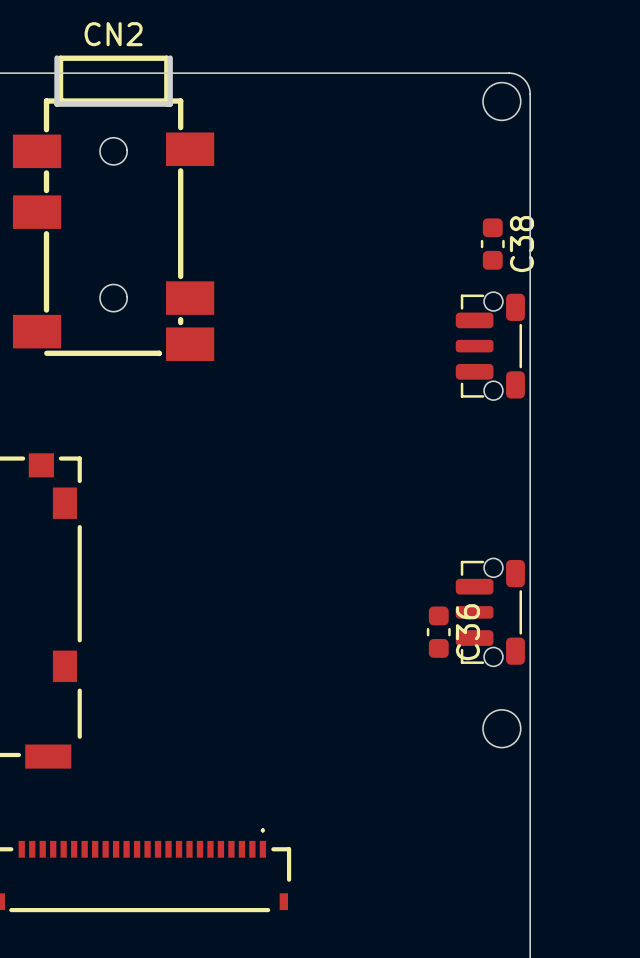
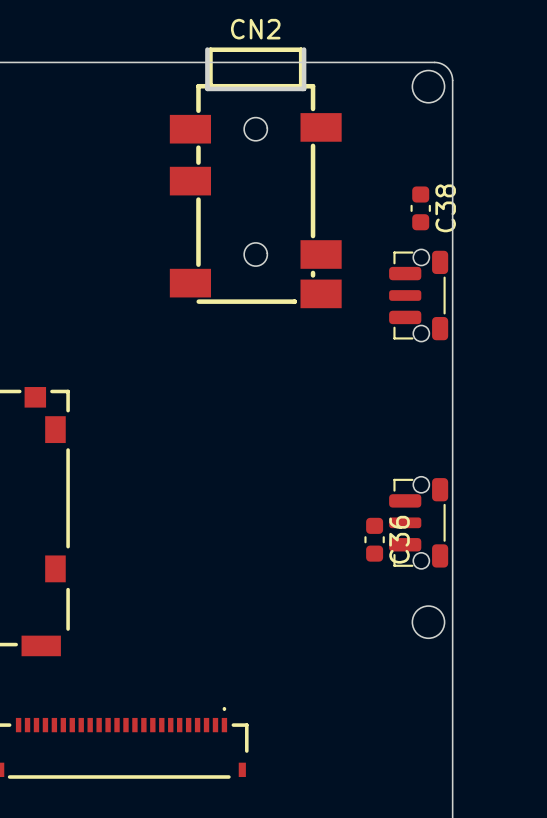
CN2 position: (113, 208) -> (255, 177)

